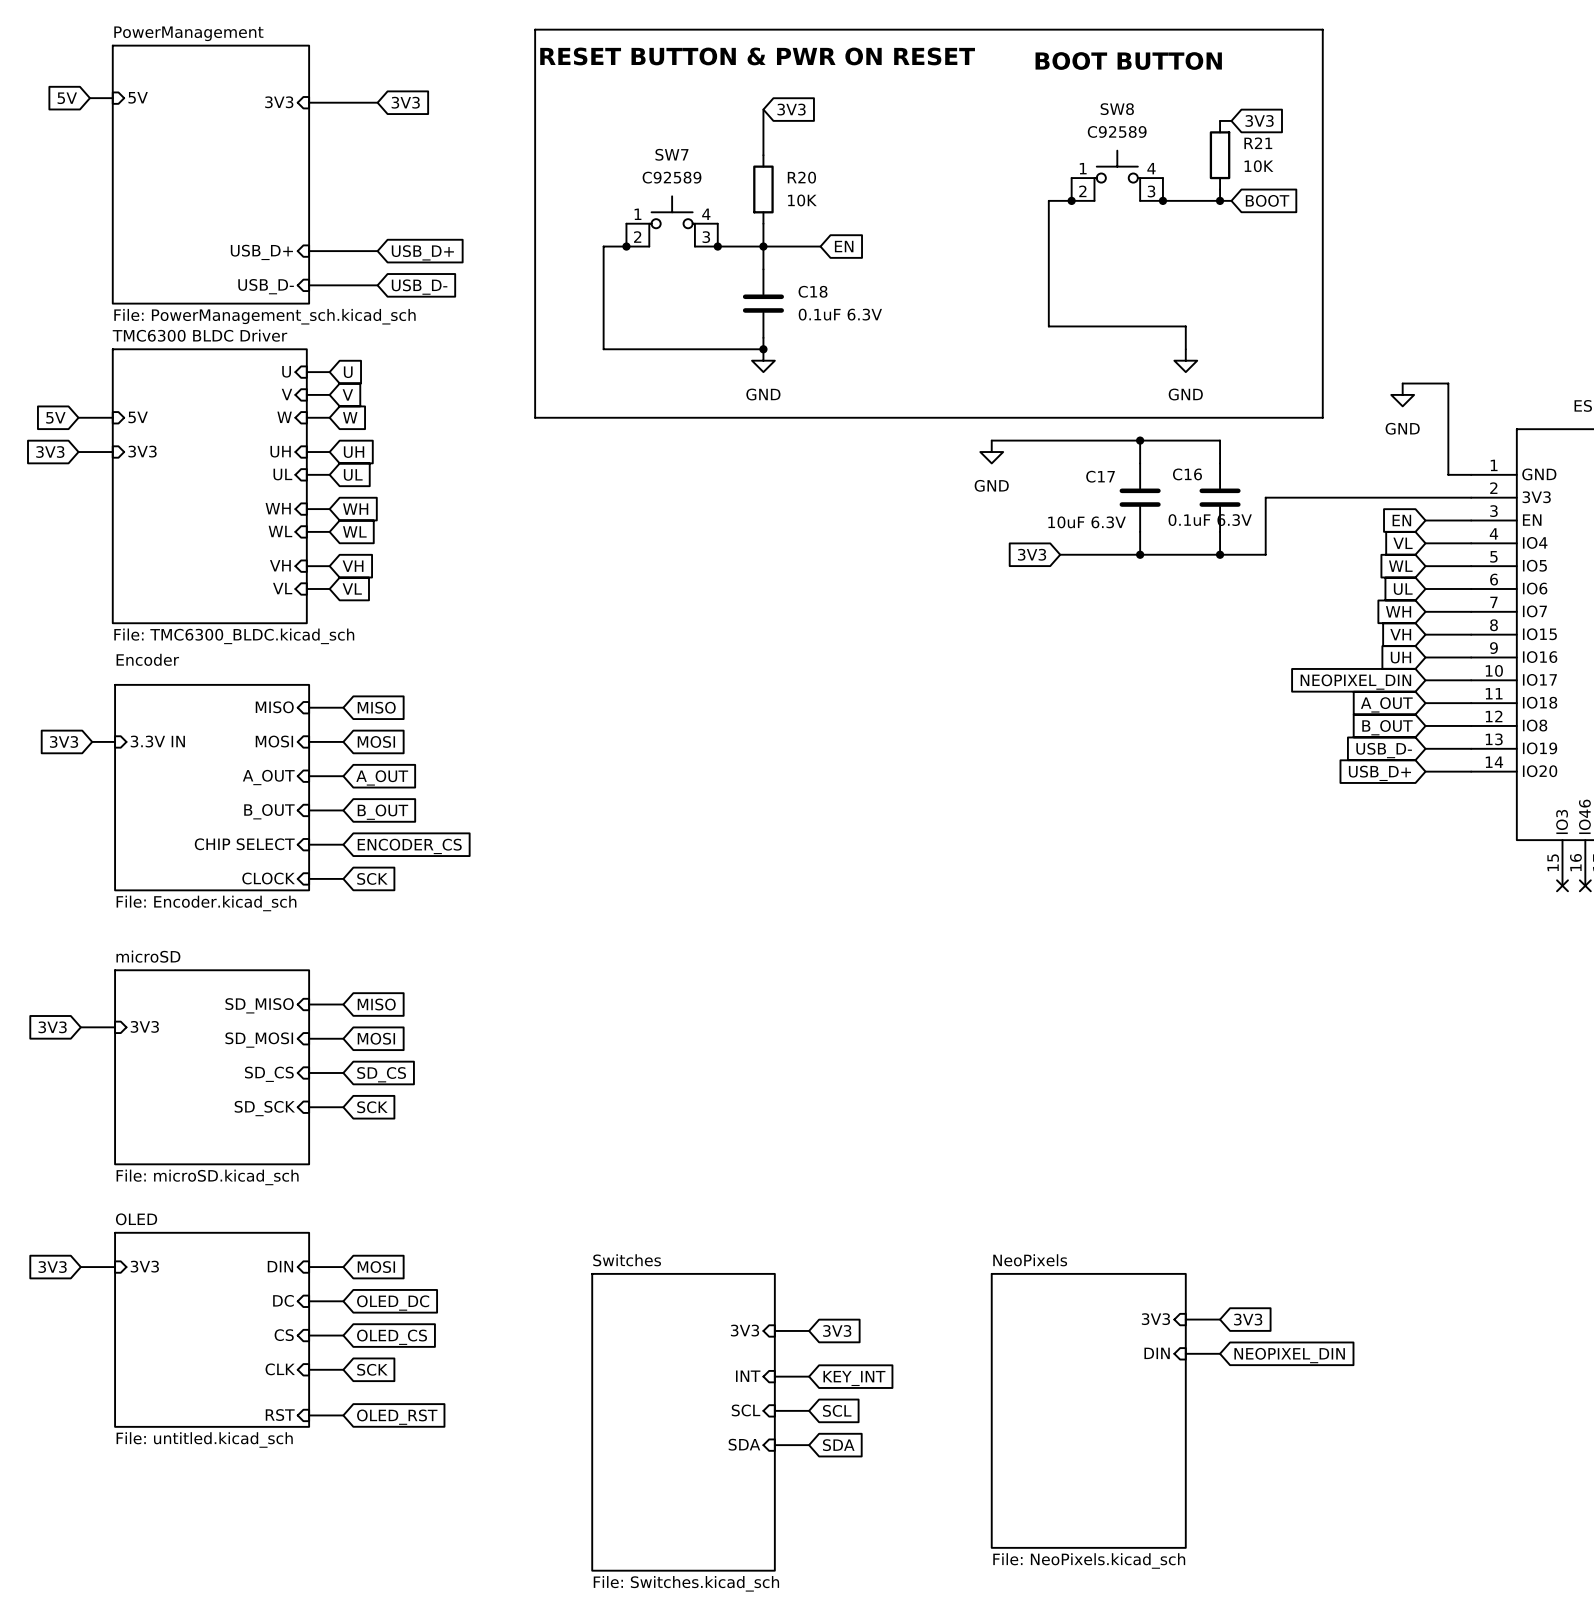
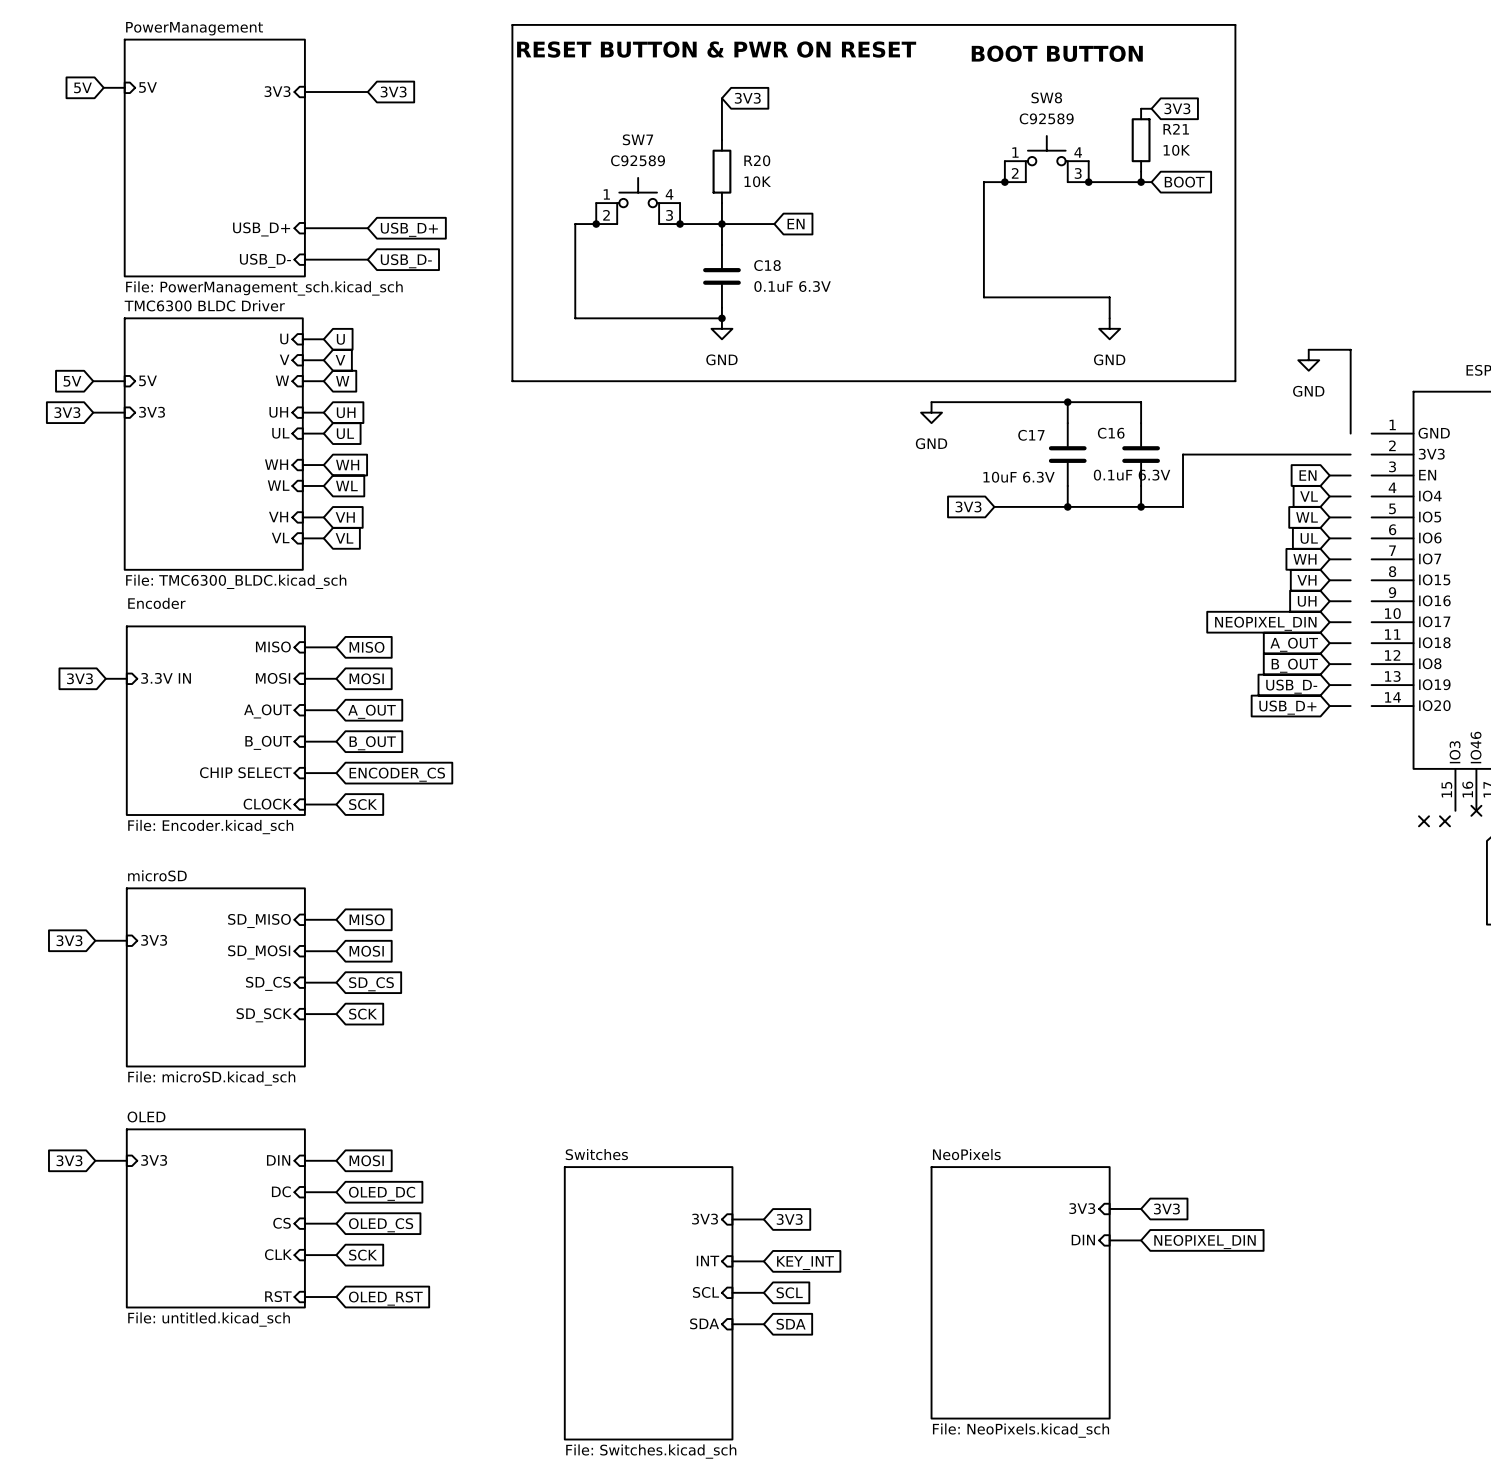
wire: (1448, 474) (1471, 474) -> none
wire: (1448, 497) (1471, 497) -> none
wire: (1448, 520) (1471, 520) -> none
wire: (1448, 543) (1471, 543) -> none
wire: (1448, 566) (1471, 566) -> none
wire: (1448, 588) (1471, 588) -> none
wire: (1448, 611) (1471, 611) -> none
wire: (1448, 634) (1471, 634) -> none
wire: (1448, 657) (1471, 657) -> none
wire: (1448, 680) (1471, 680) -> none
wire: (1448, 703) (1471, 703) -> none
wire: (1448, 725) (1471, 725) -> none
wire: (1448, 748) (1471, 748) -> none
wire: (1448, 771) (1471, 771) -> none
no-connect mark position: (1562, 885) -> (1444, 821)
no-connect mark: none -> (1424, 821)

